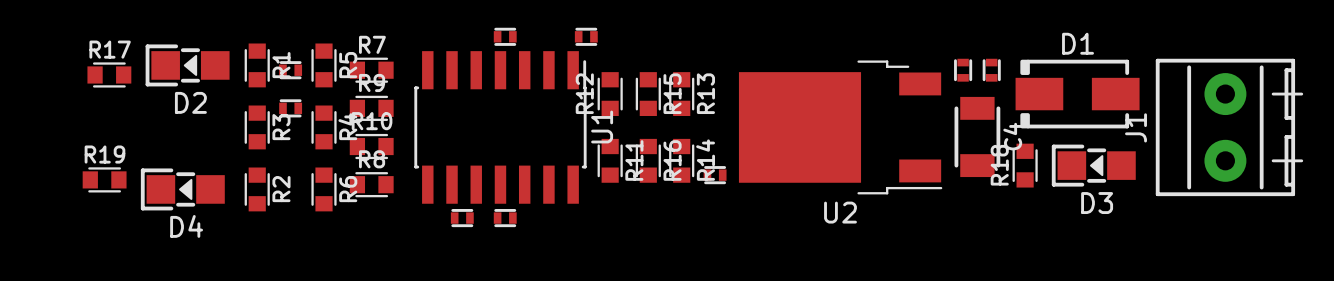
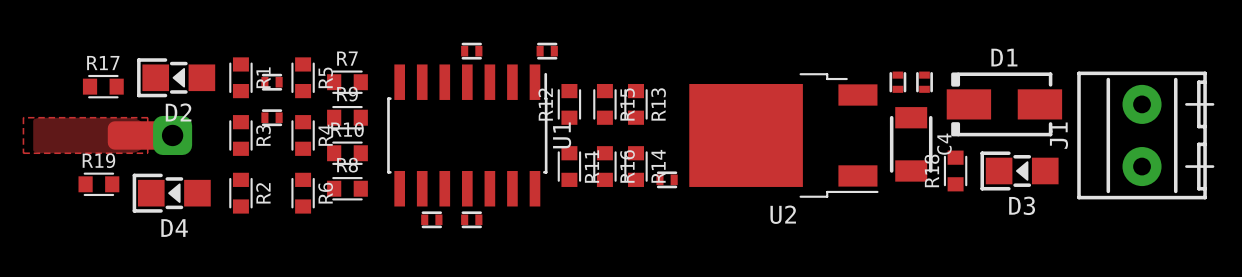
top zone outline: none -> (23, 117) (23, 153) (147, 153) (147, 117) (23, 117)
part: none -> (149, 135)

